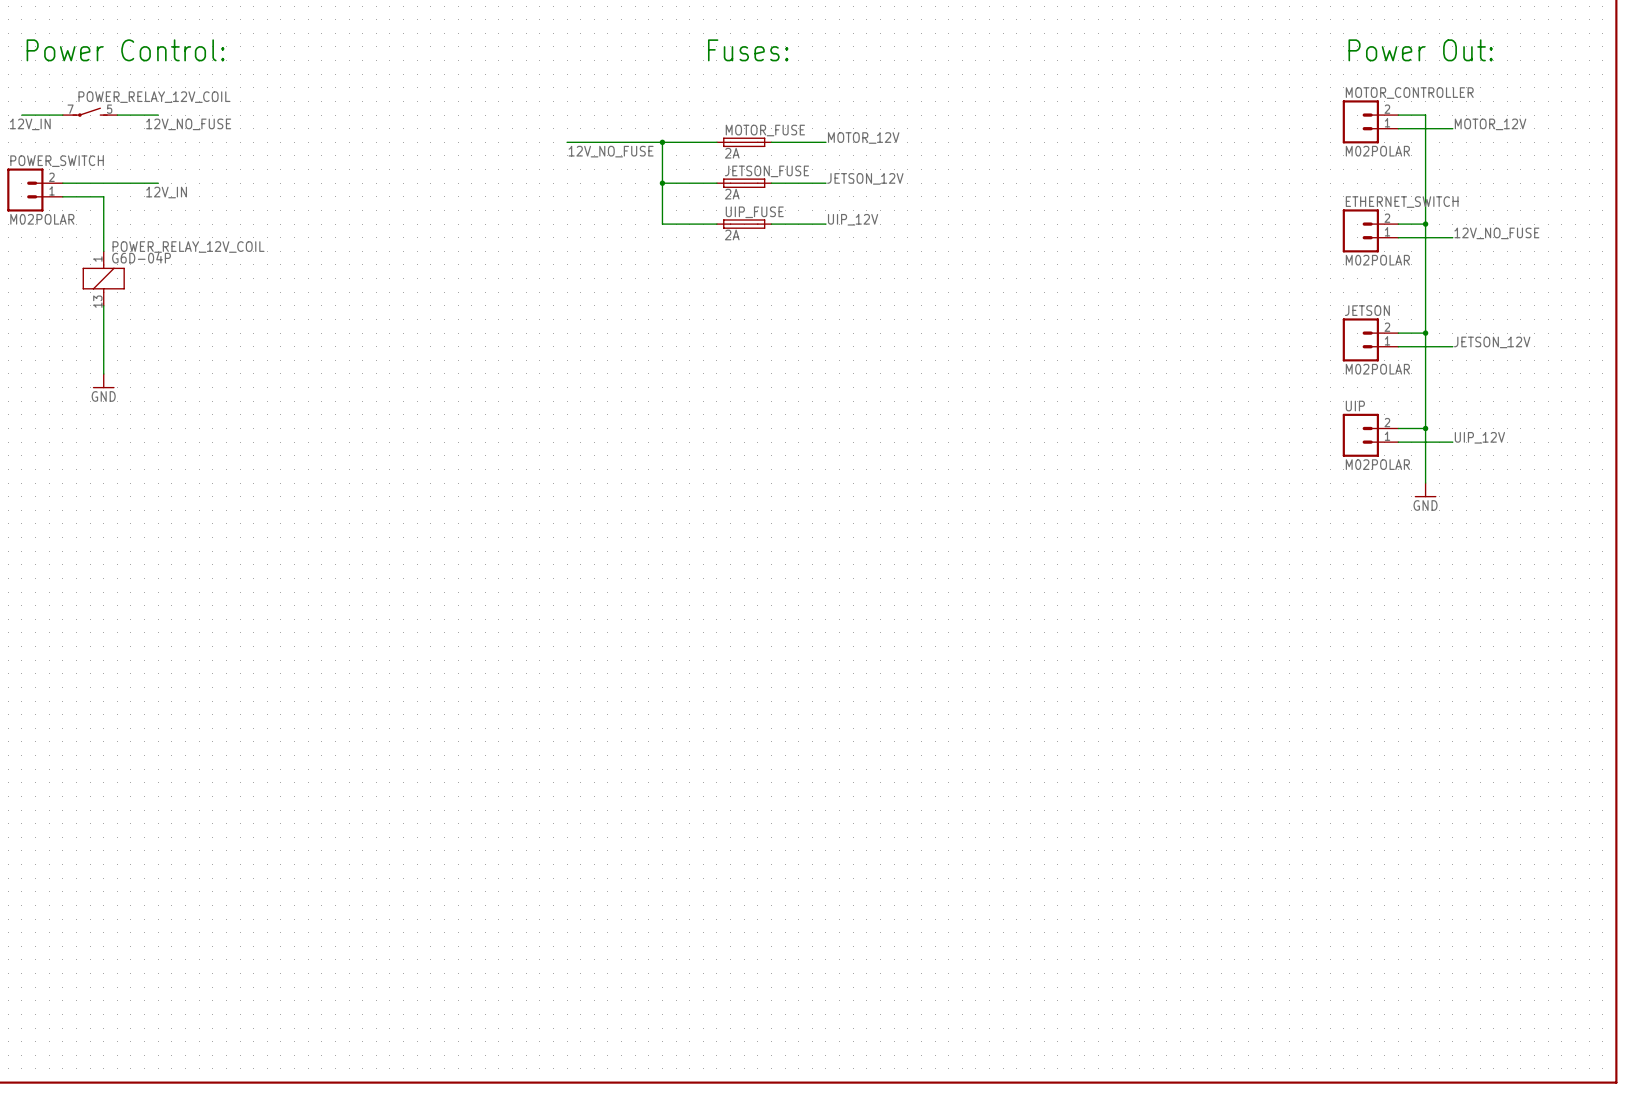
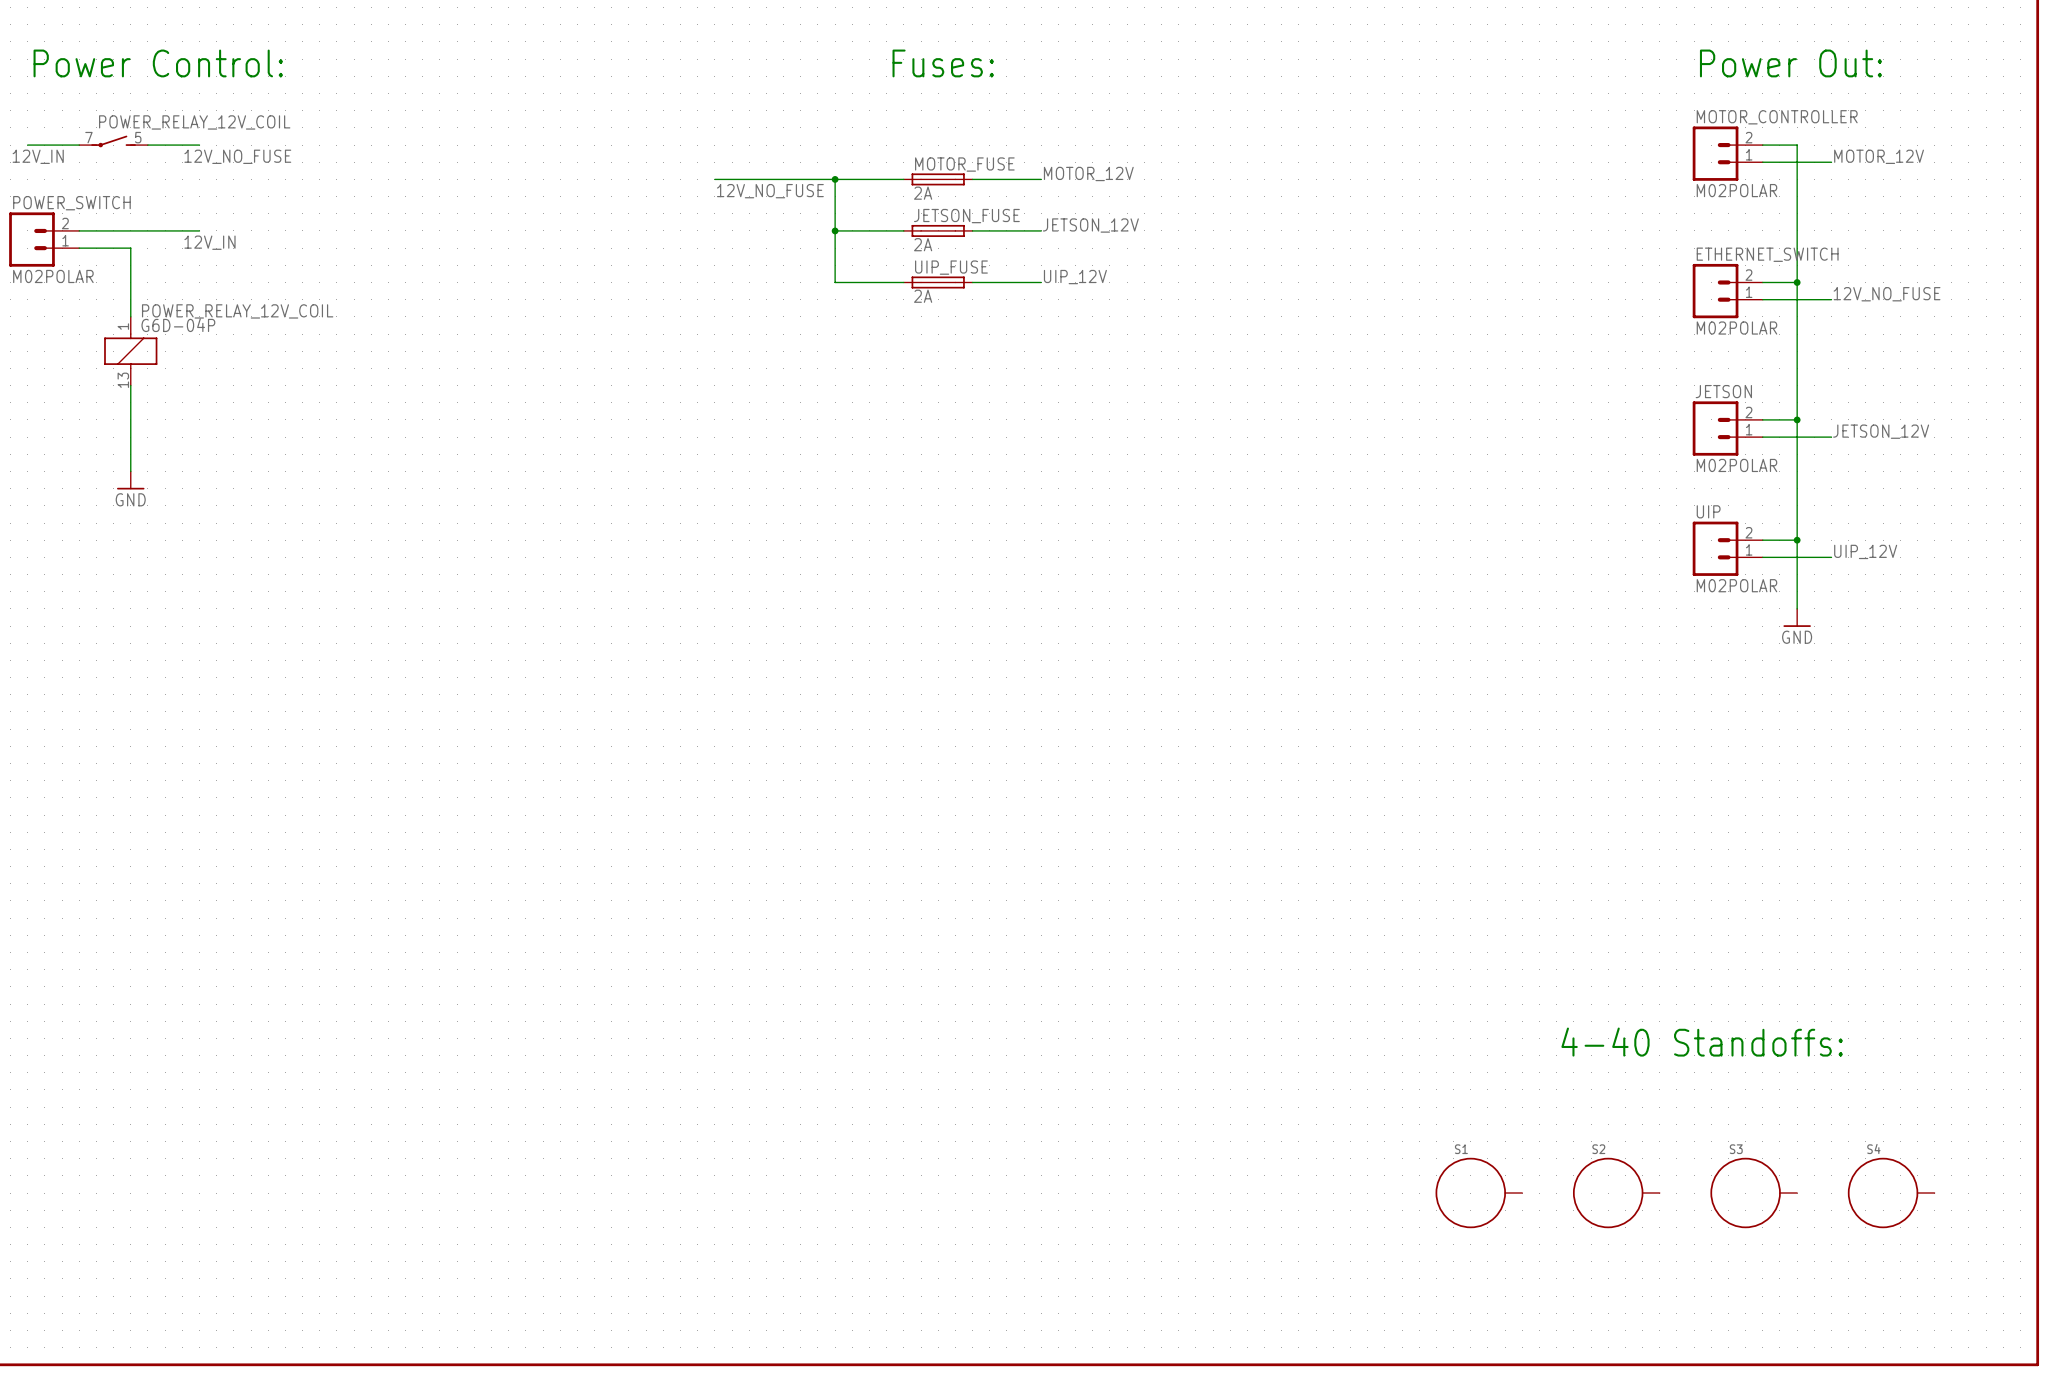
text: none -> 4-40 Standoffs: (1702, 1042)
S1: none -> (1478, 1193)
S2: none -> (1616, 1193)
S3: none -> (1753, 1193)
S4: none -> (1891, 1193)

